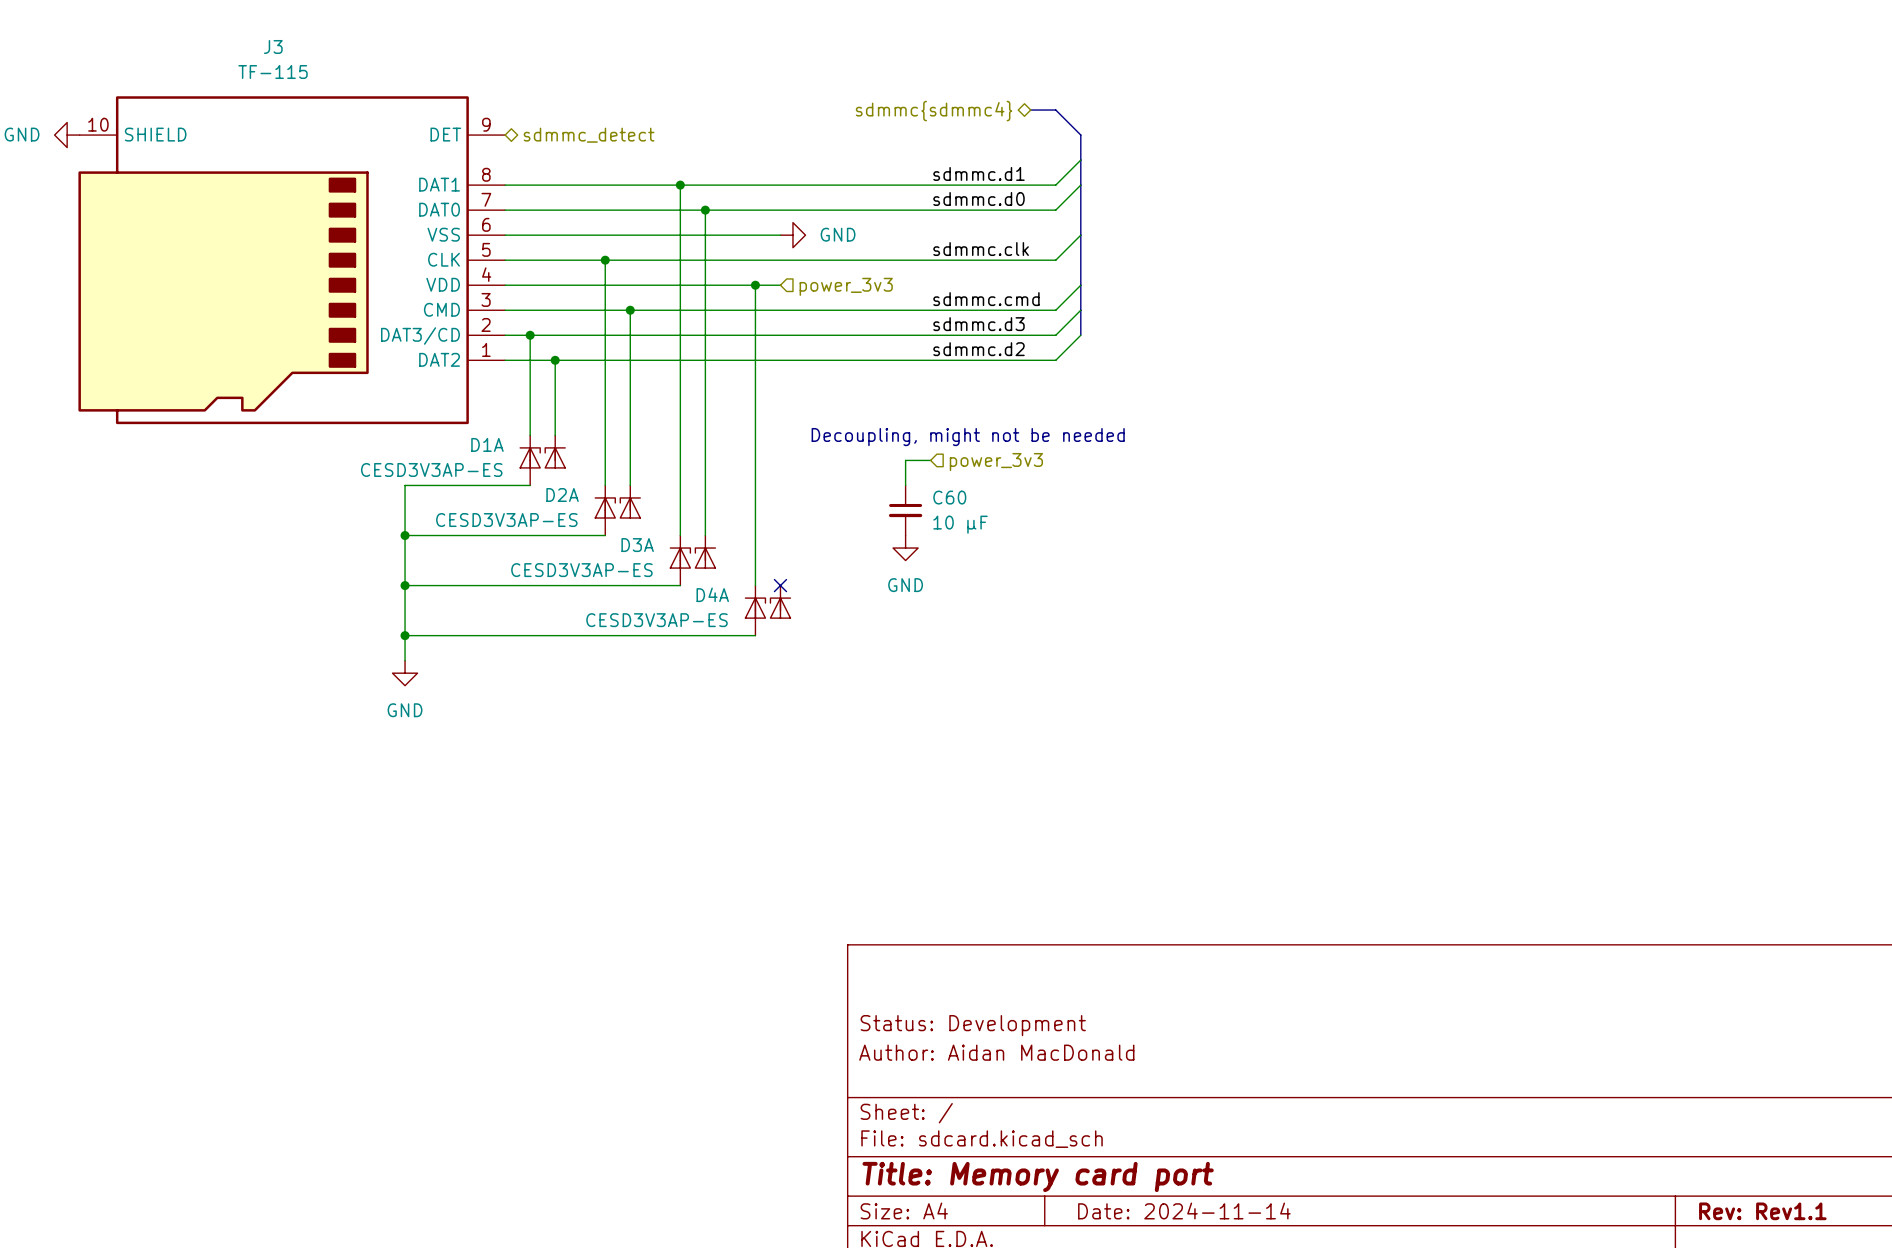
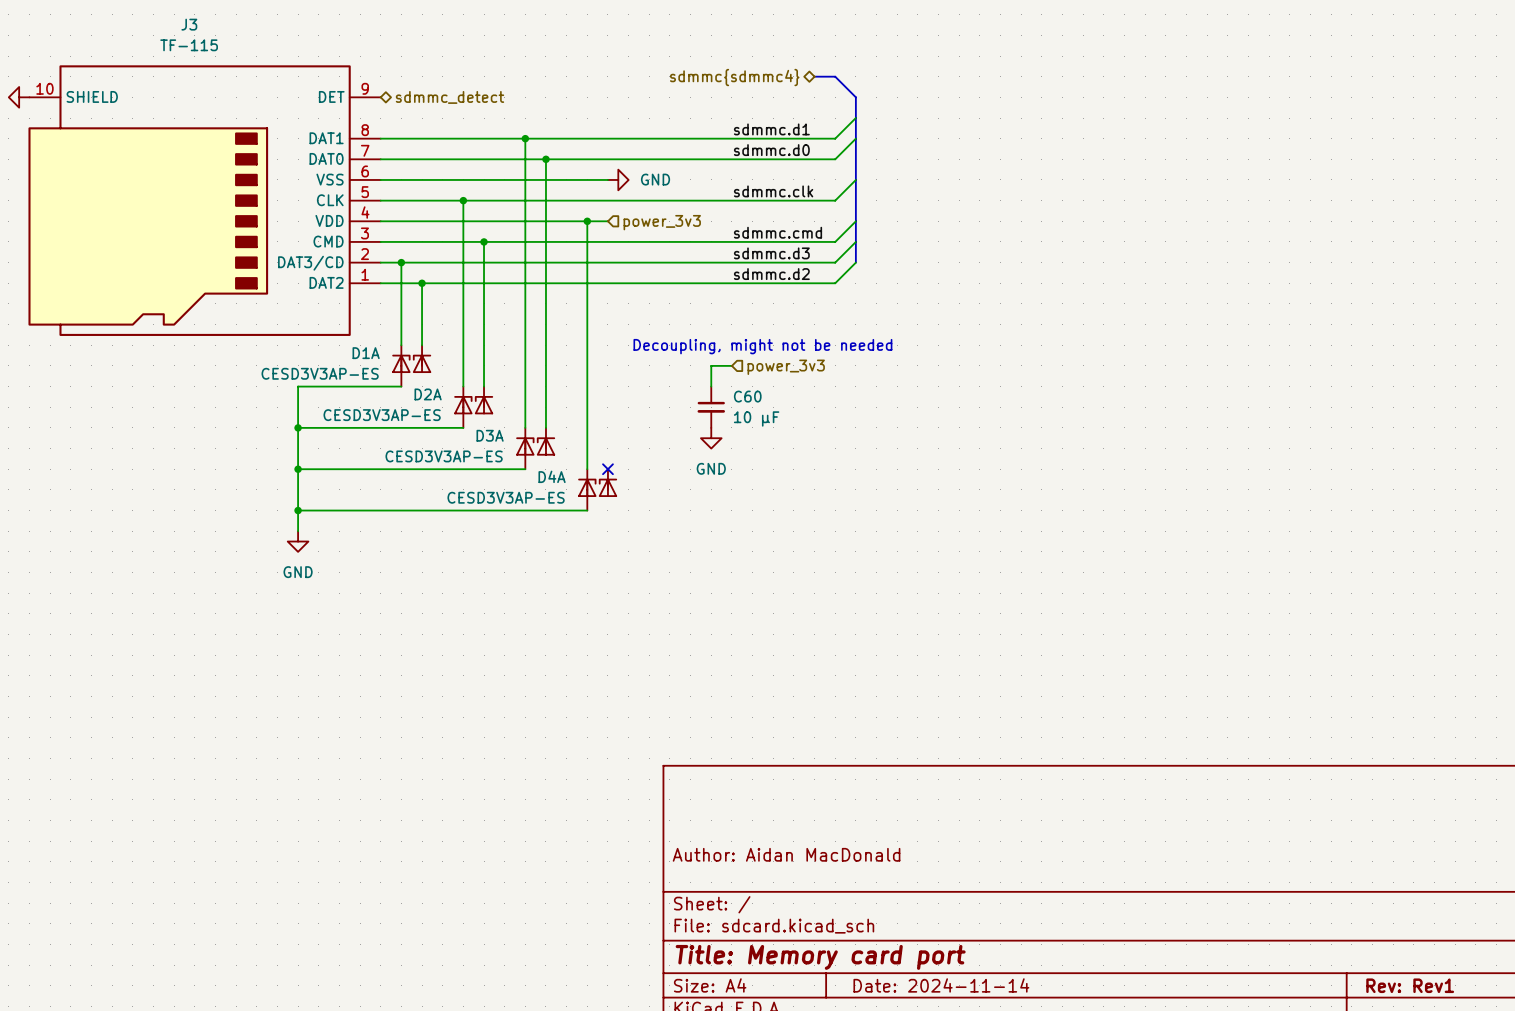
title block: Status: Development (973, 1025) -> none
title block: Rev: Rev1.1 (1762, 1211) -> Rev: Rev1 (1410, 985)

